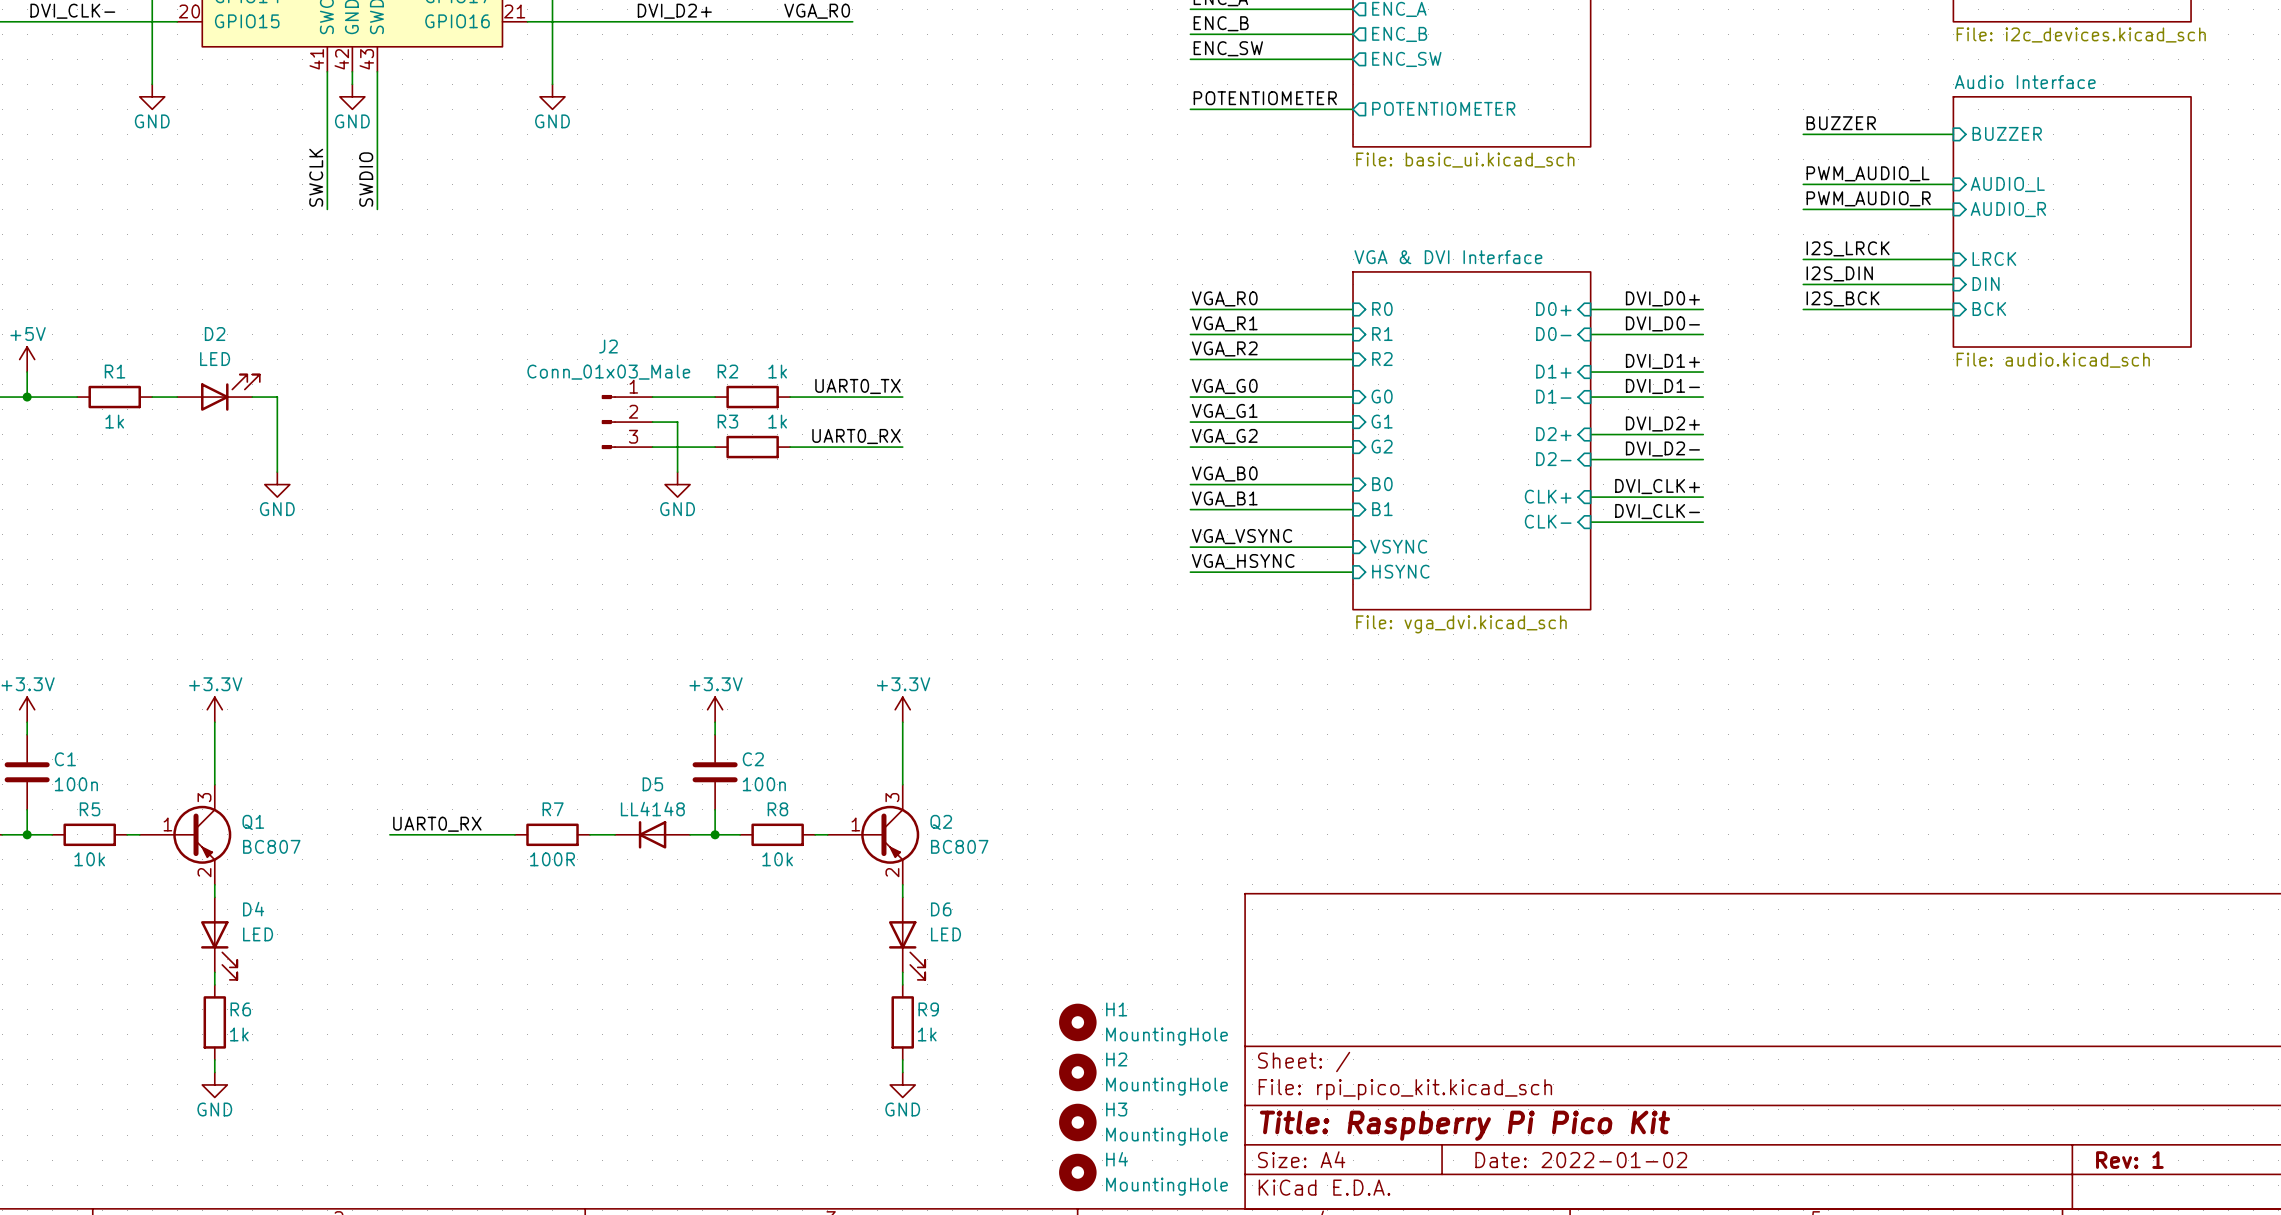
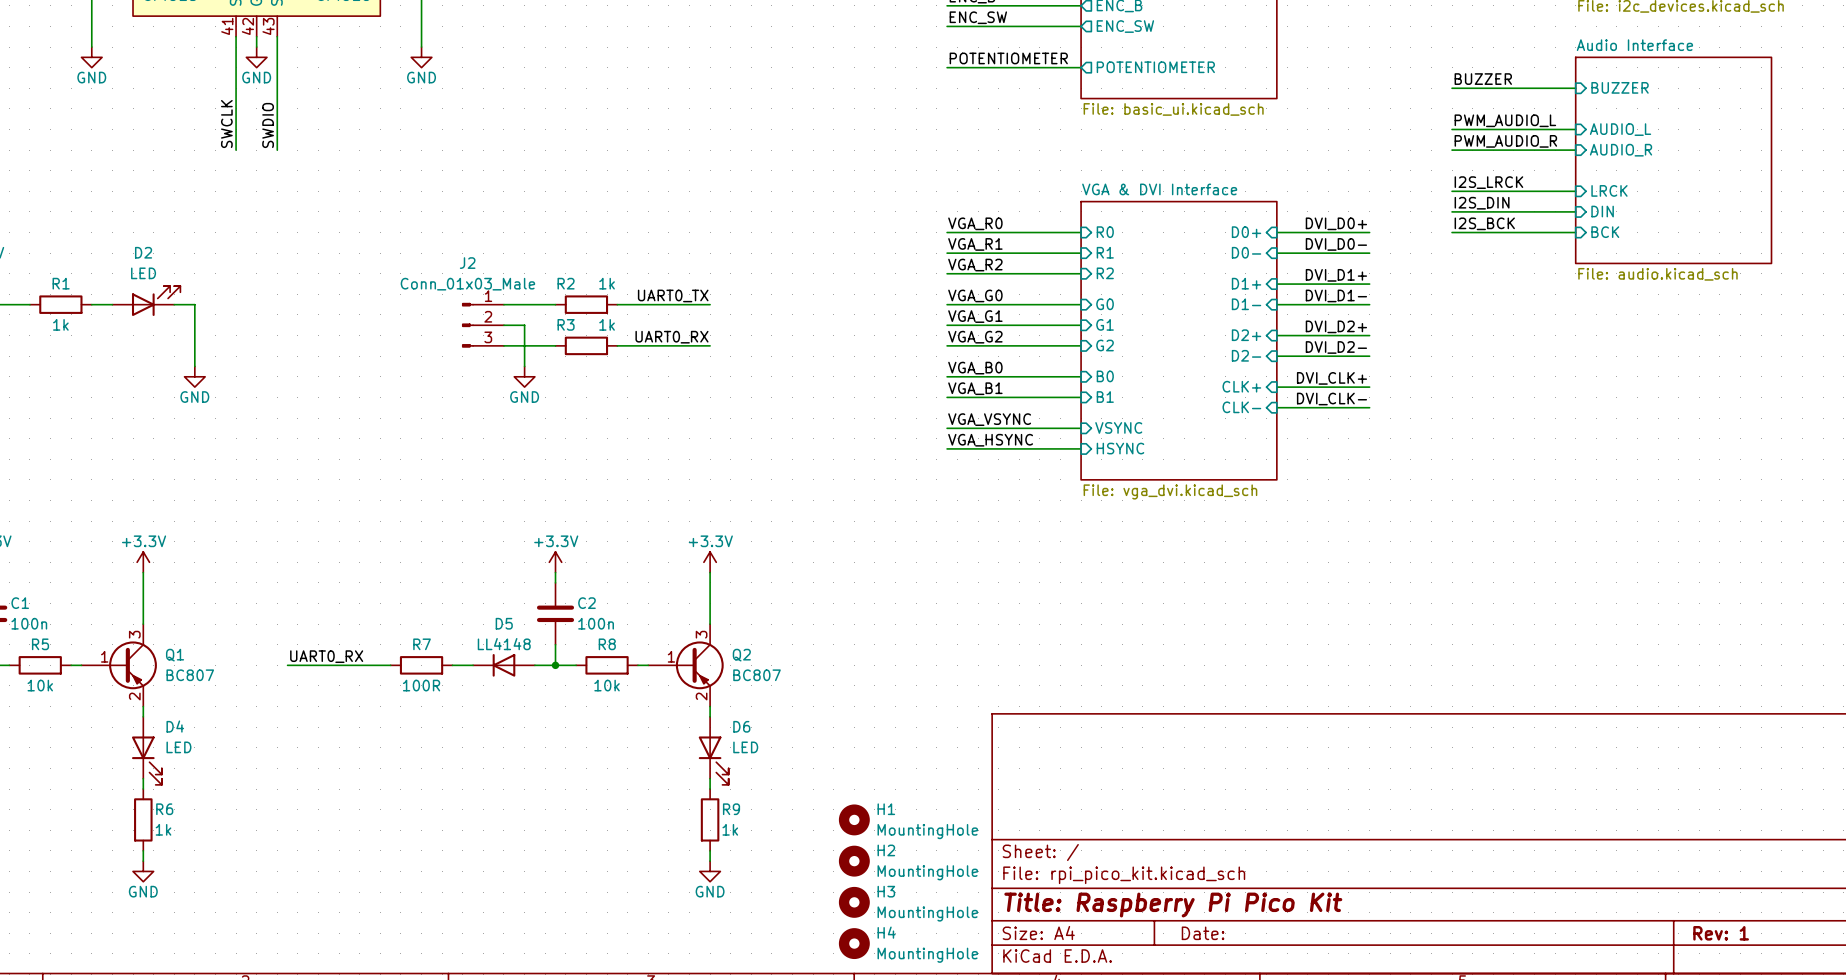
title block: Date: 2022-01-02 (1581, 1160) -> Date: (1203, 933)

